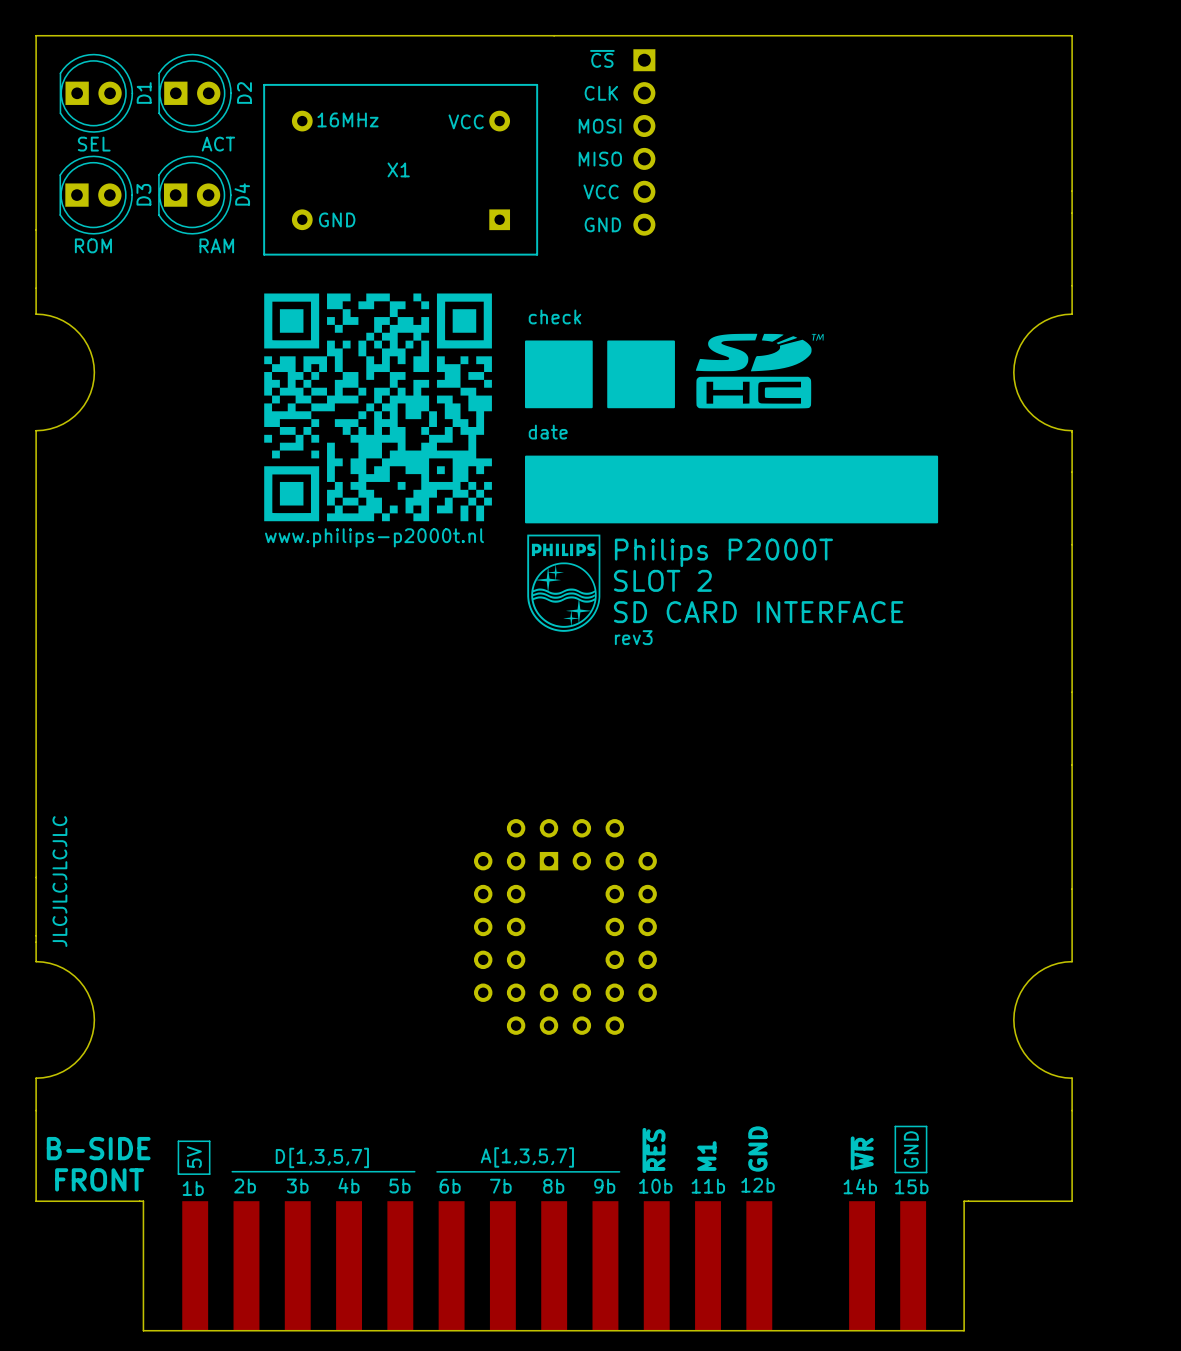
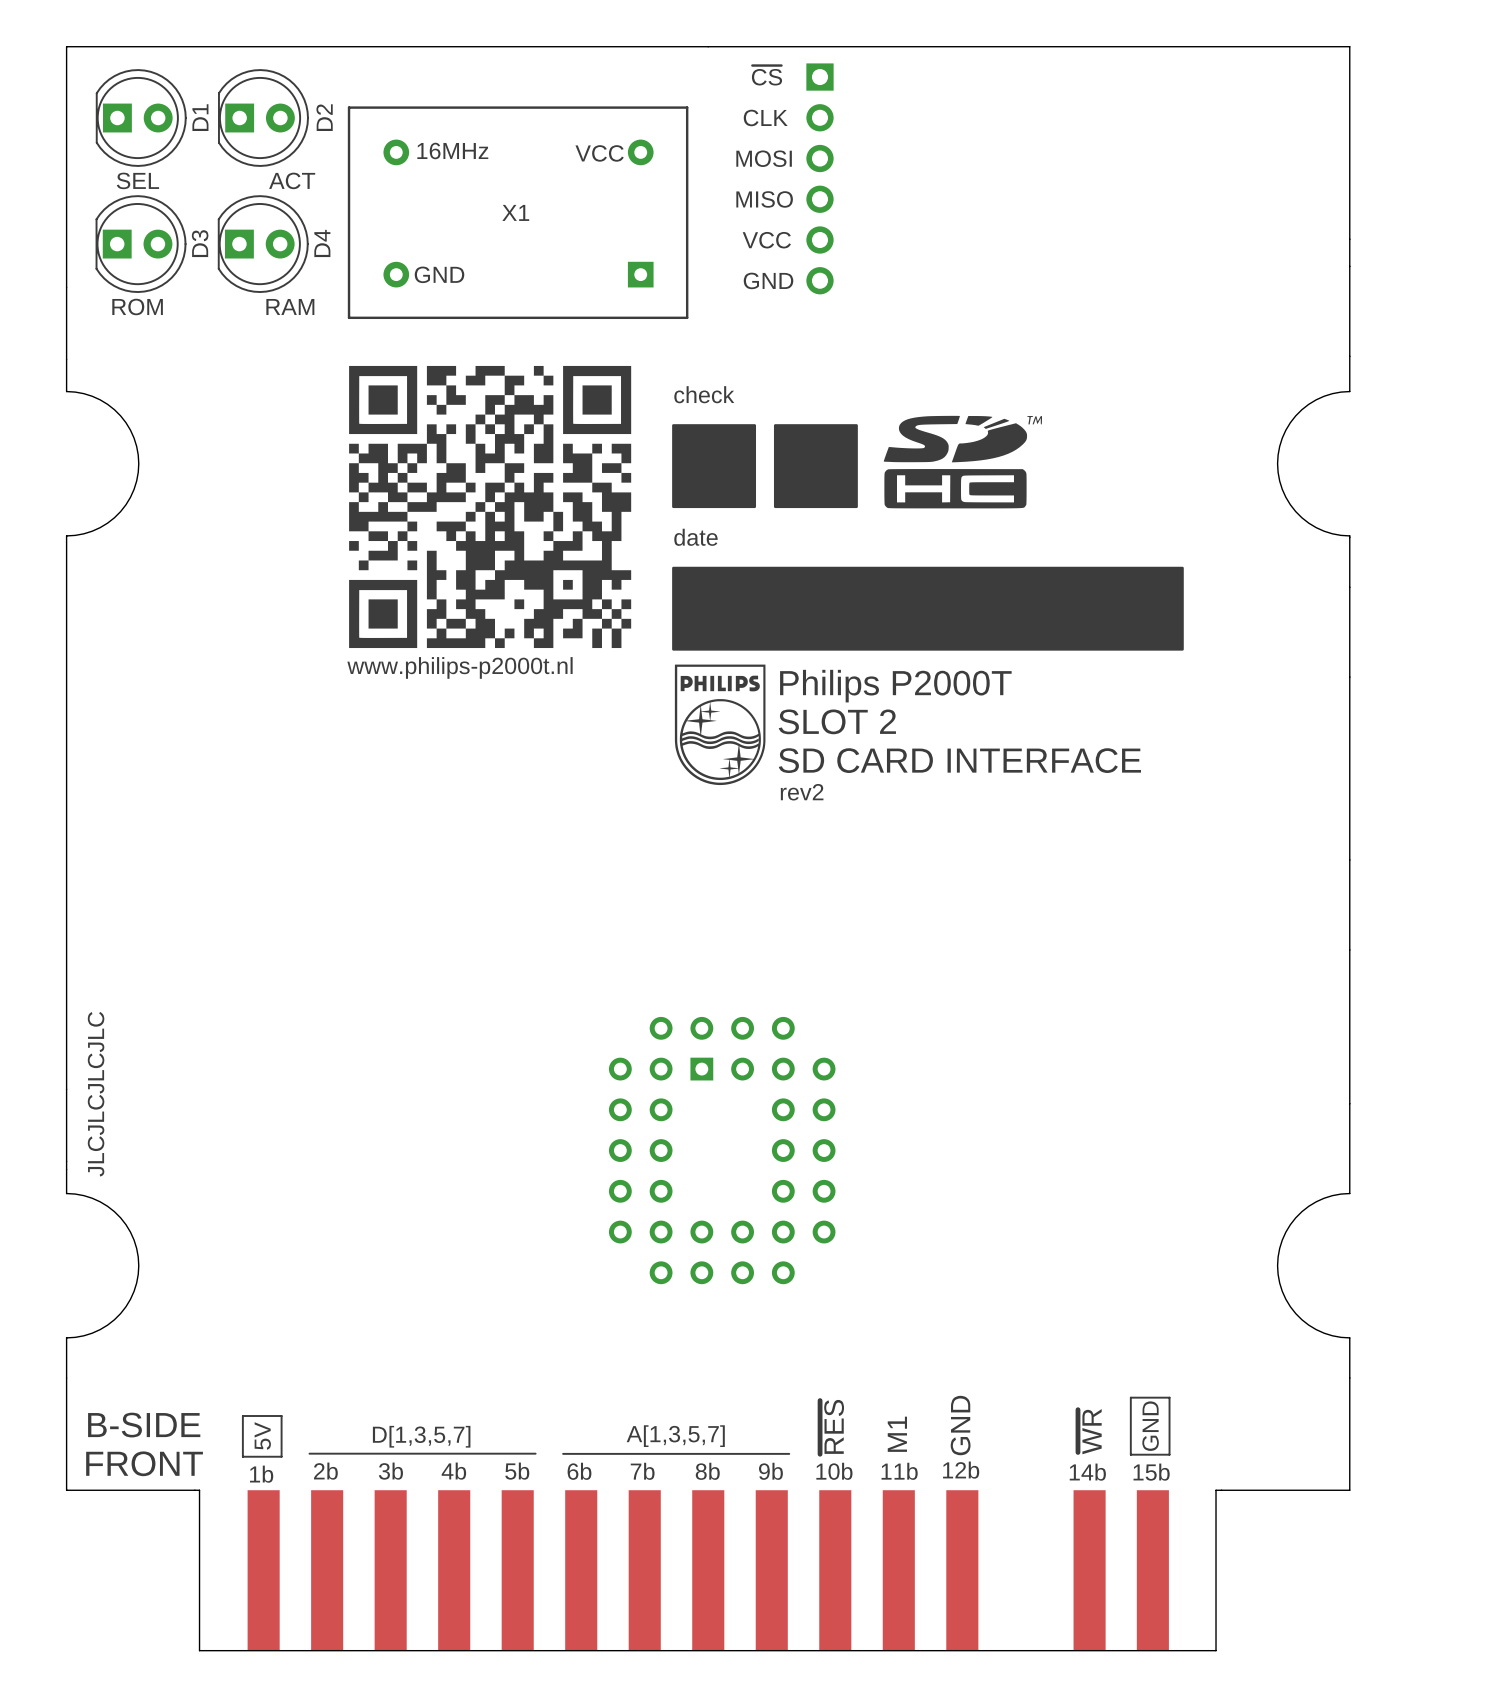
text: rev3 (633, 637) -> rev2 (802, 792)

